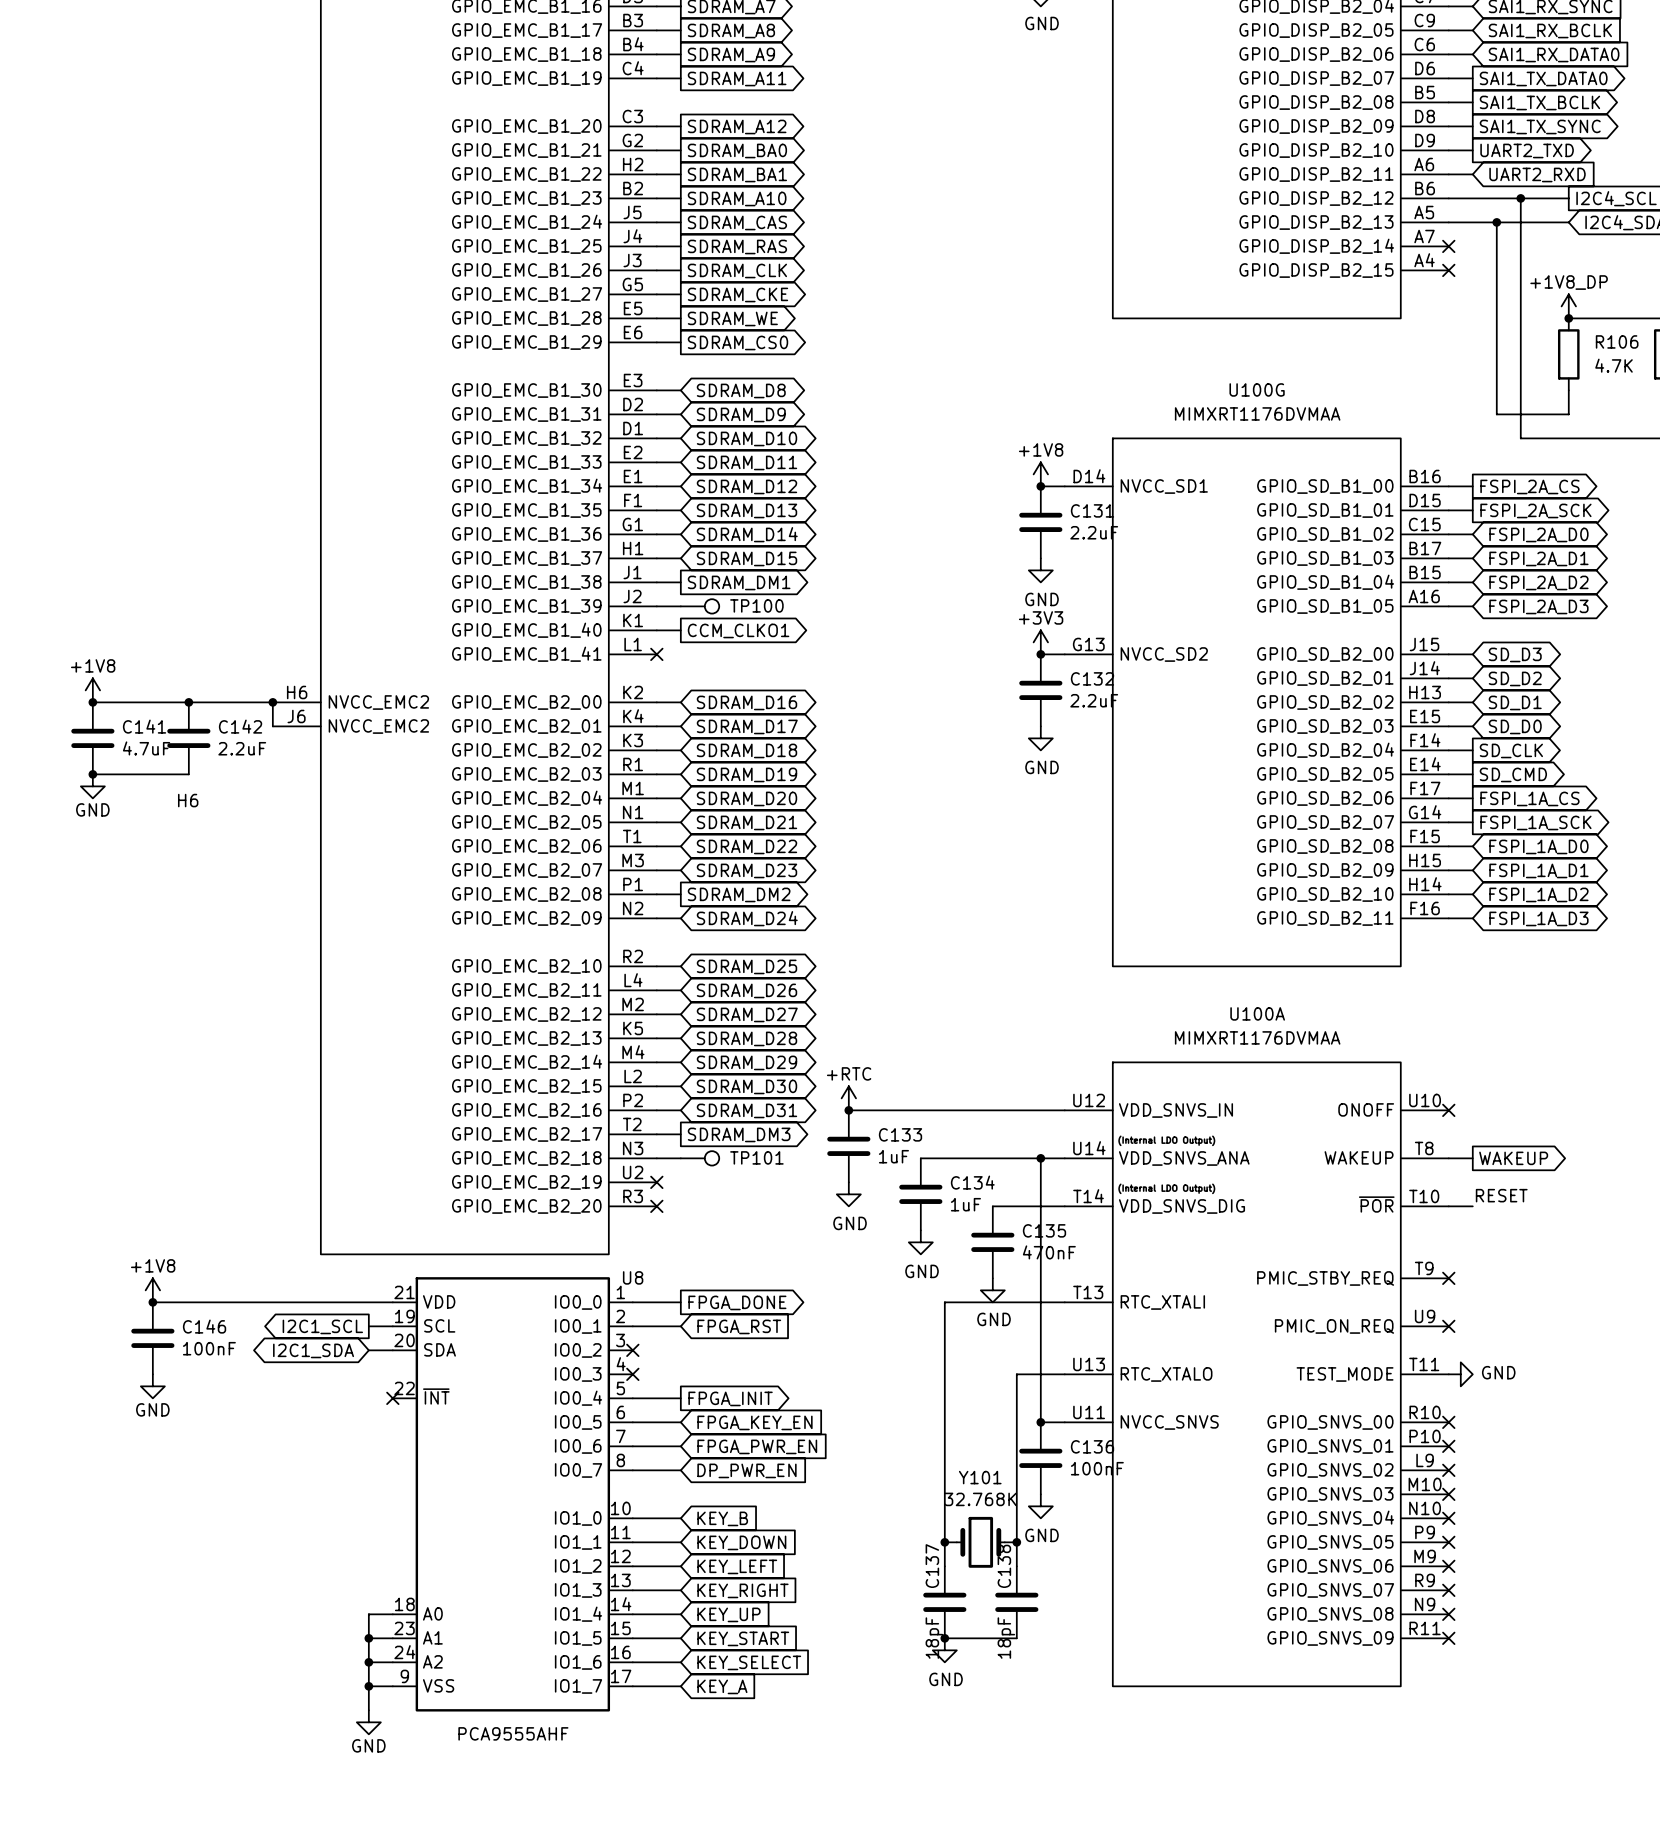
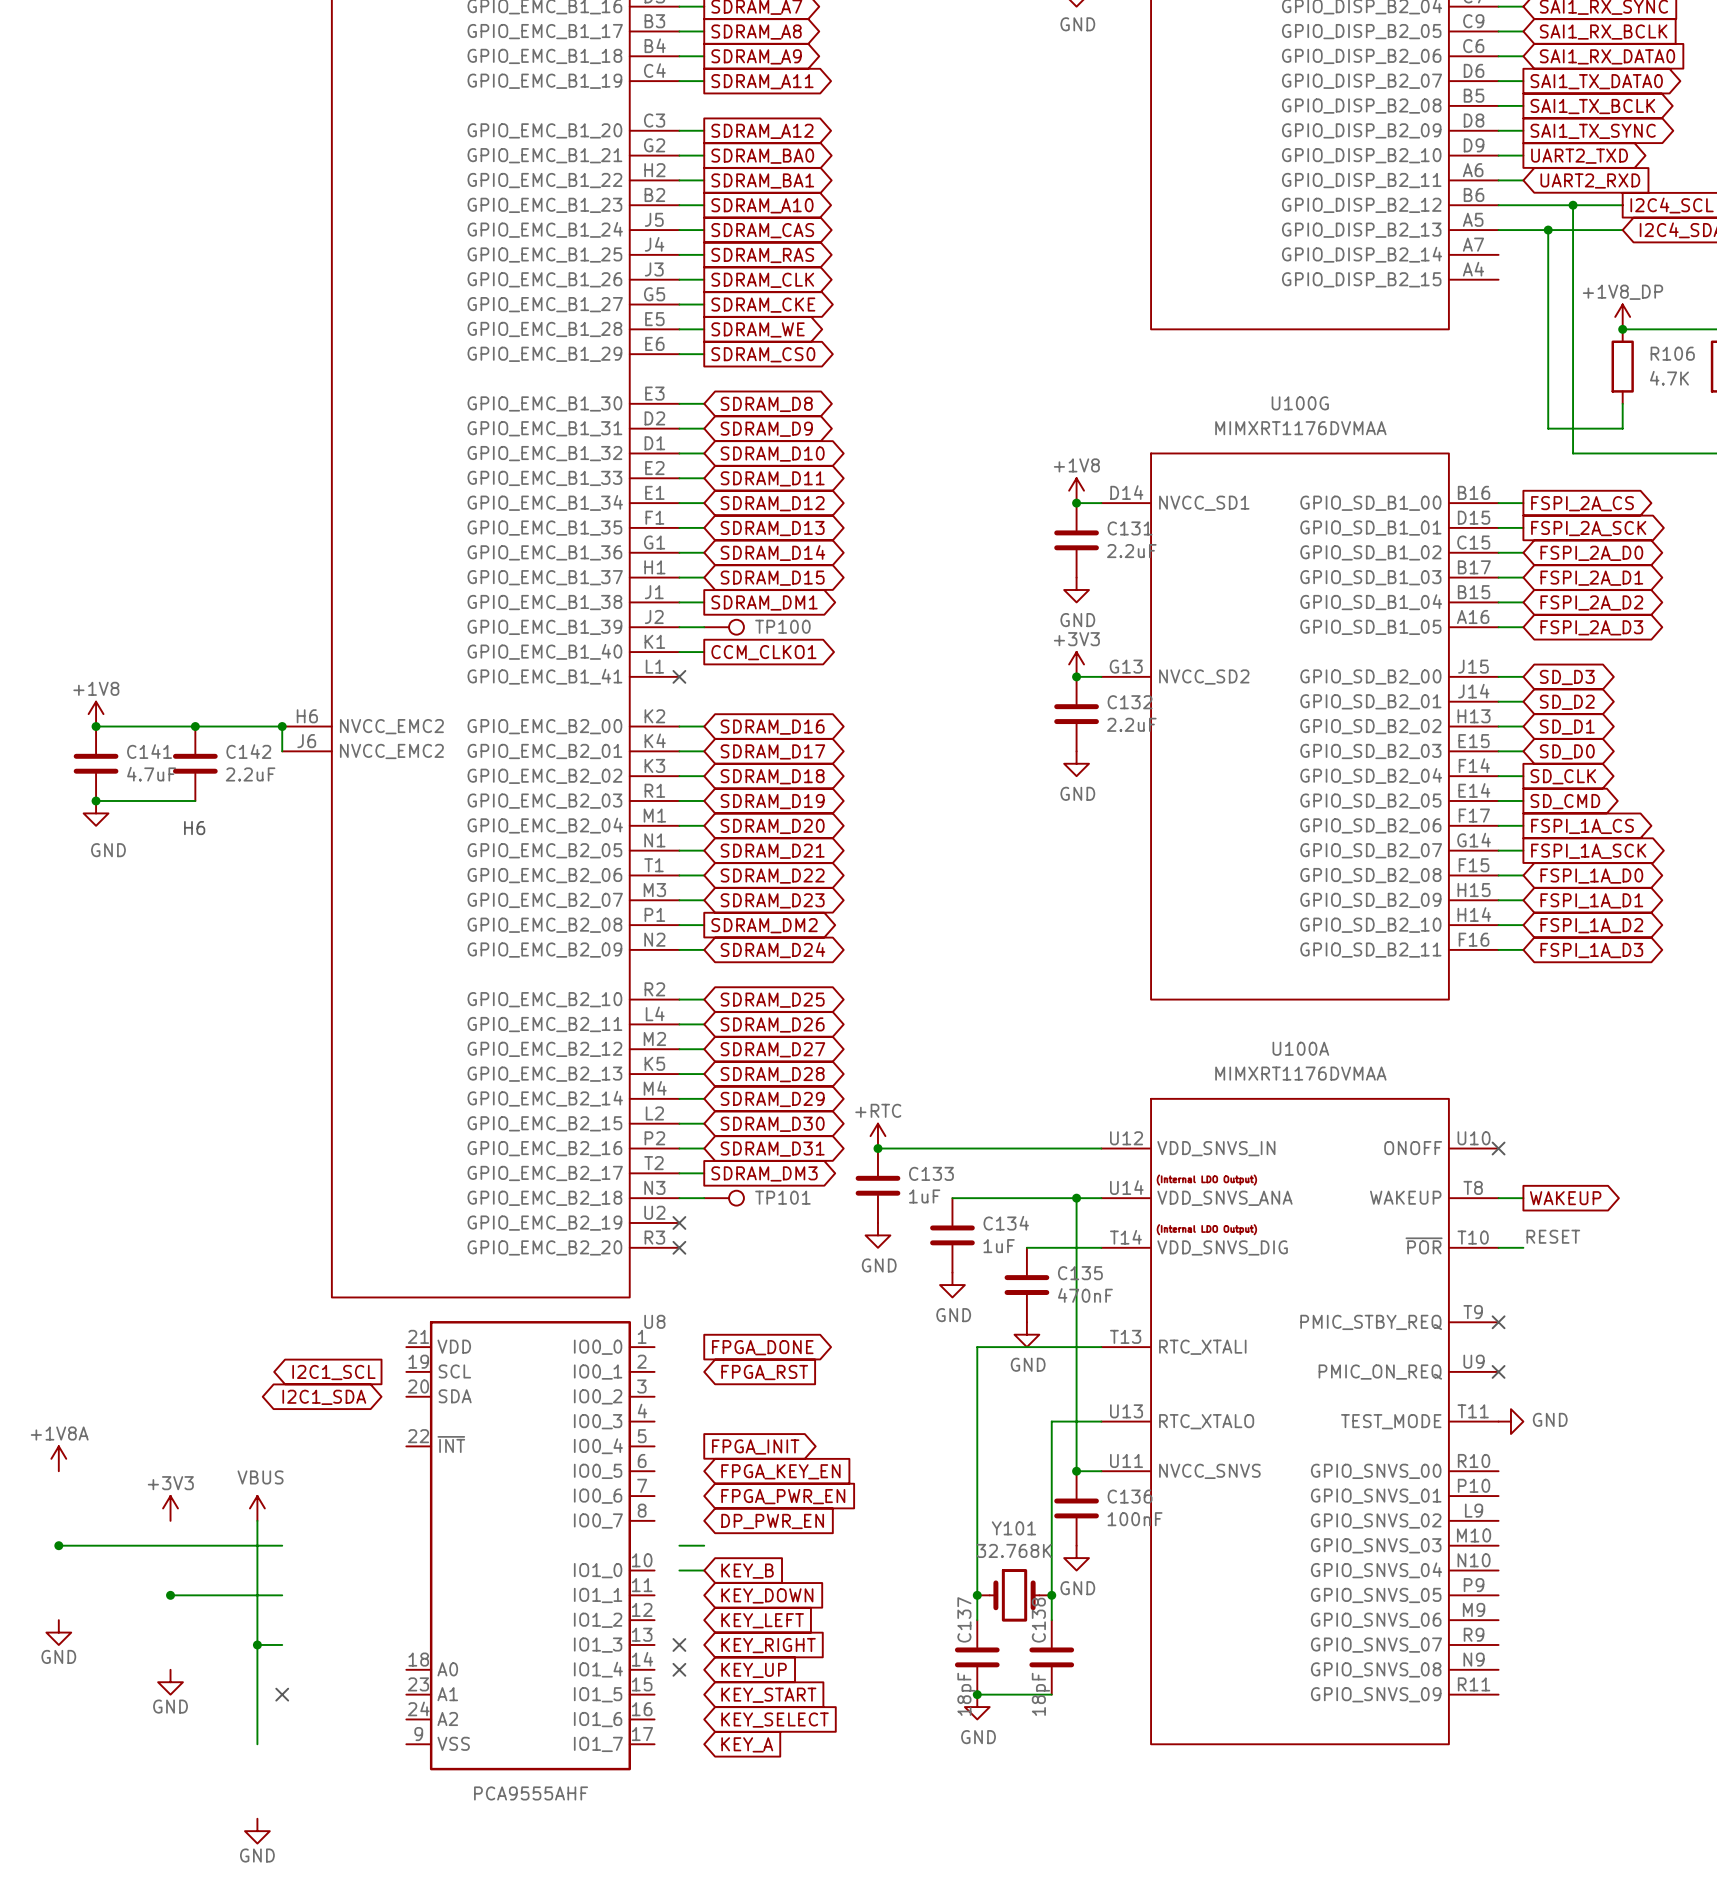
no-connect mark: (1448, 246) -> none
no-connect mark: (1448, 270) -> none
power symbol text position: GND (92, 809) -> GND (108, 850)
power symbol: +1V8 (152, 1290) -> none
wire: (152, 1302) (392, 1302) -> none
junction: (152, 1302) -> none
wire: (632, 1302) (680, 1302) -> none
wire: (368, 1326) (392, 1326) -> none
wire: (632, 1326) (680, 1326) -> none
C146: 100nF (152, 1338) -> none
wire: (368, 1350) (392, 1350) -> none
no-connect mark: (632, 1350) -> none
no-connect mark: (632, 1374) -> none
power symbol: GND (152, 1386) -> none
no-connect mark: (392, 1398) -> none
wire: (632, 1398) (680, 1398) -> none
power symbol: none -> +1V8A (58, 1458)
wire: (632, 1422) (680, 1422) -> none
no-connect mark: (1448, 1422) -> none
wire: (632, 1446) (680, 1446) -> none
no-connect mark: (1448, 1446) -> none
power symbol: none -> +3V3 (170, 1508)
power symbol: none -> VBUS (257, 1508)
wire: none -> (257, 1520) (257, 1744)
wire: (632, 1470) (680, 1470) -> none
no-connect mark: (1448, 1470) -> none
wire: none -> (58, 1545) (282, 1545)
junction: none -> (58, 1545)
no-connect mark: (1448, 1494) -> none
wire: (632, 1518) (656, 1518) -> (679, 1545) (704, 1545)
no-connect mark: (1448, 1518) -> none
wire: none -> (170, 1595) (282, 1595)
junction: none -> (170, 1595)
wire: (632, 1542) (680, 1542) -> none
no-connect mark: (1448, 1542) -> none
wire: (632, 1566) (680, 1566) -> none
no-connect mark: (1448, 1566) -> none
power symbol: none -> GND (58, 1632)
junction: none -> (257, 1644)
wire: (632, 1590) (680, 1590) -> none
no-connect mark: none -> (679, 1644)
no-connect mark: (1448, 1590) -> none
wire: (392, 1614) (368, 1614) (368, 1710) -> none
wire: (632, 1614) (680, 1614) -> none
no-connect mark: none -> (679, 1669)
no-connect mark: (1448, 1614) -> none
power symbol: none -> GND (170, 1682)
no-connect mark: none -> (282, 1694)
wire: (368, 1638) (392, 1638) -> (257, 1644) (282, 1644)
junction: (368, 1638) -> none
wire: (632, 1638) (680, 1638) -> none
no-connect mark: (1448, 1638) -> none
wire: (368, 1662) (392, 1662) -> none
junction: (368, 1662) -> none
wire: (632, 1662) (680, 1662) -> none
wire: (368, 1686) (392, 1686) -> none
junction: (368, 1686) -> none
wire: (632, 1686) (680, 1686) -> none
power symbol: GND (368, 1722) -> none
power symbol: none -> GND (257, 1831)

